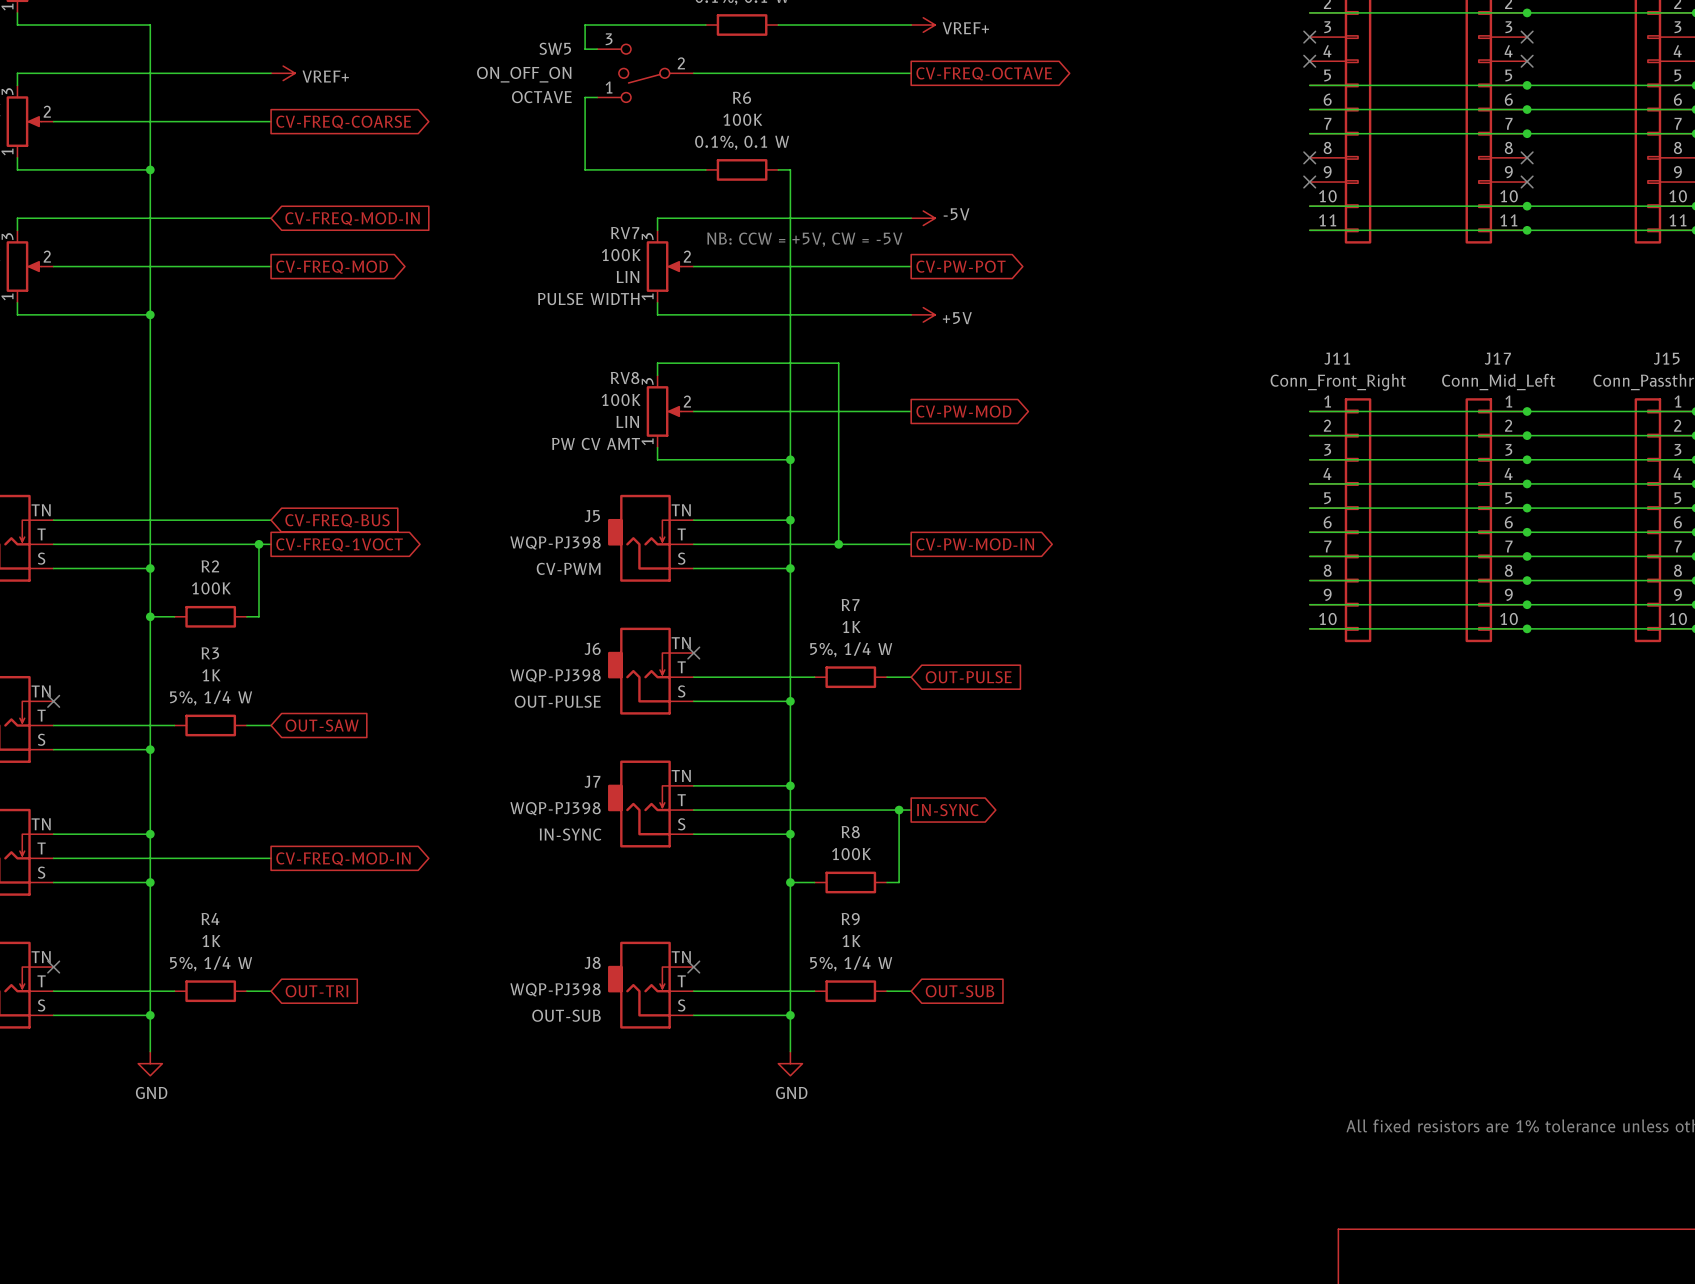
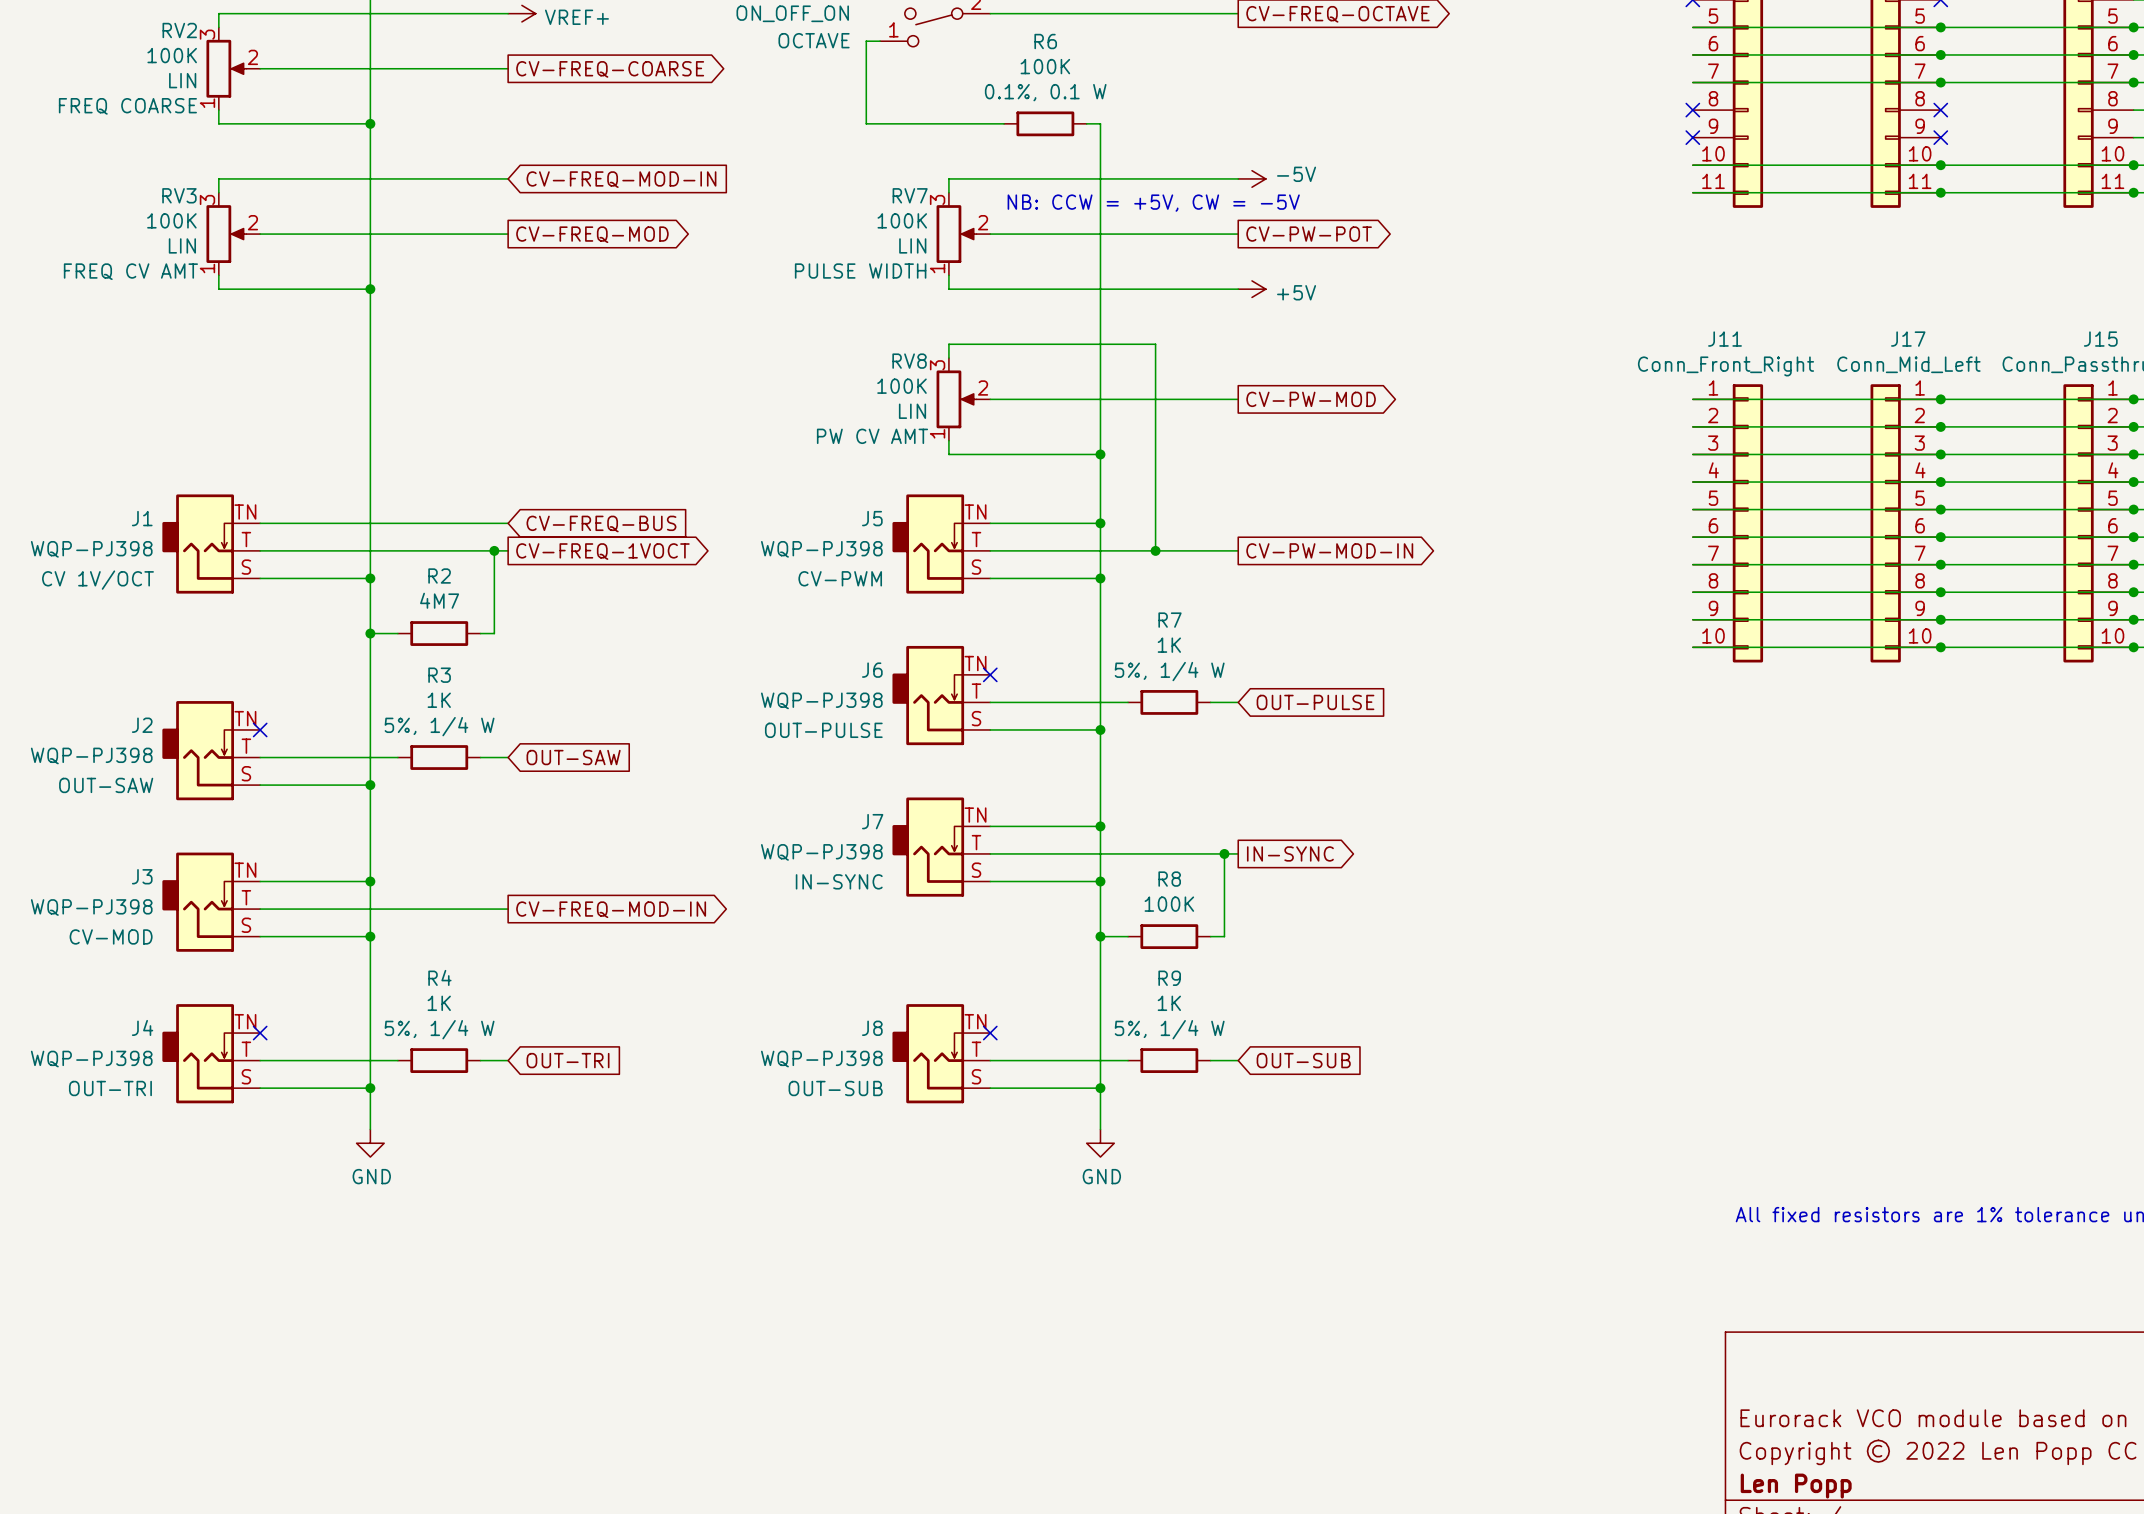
R2 value: 100K (211, 588) -> 4M7 (439, 600)

